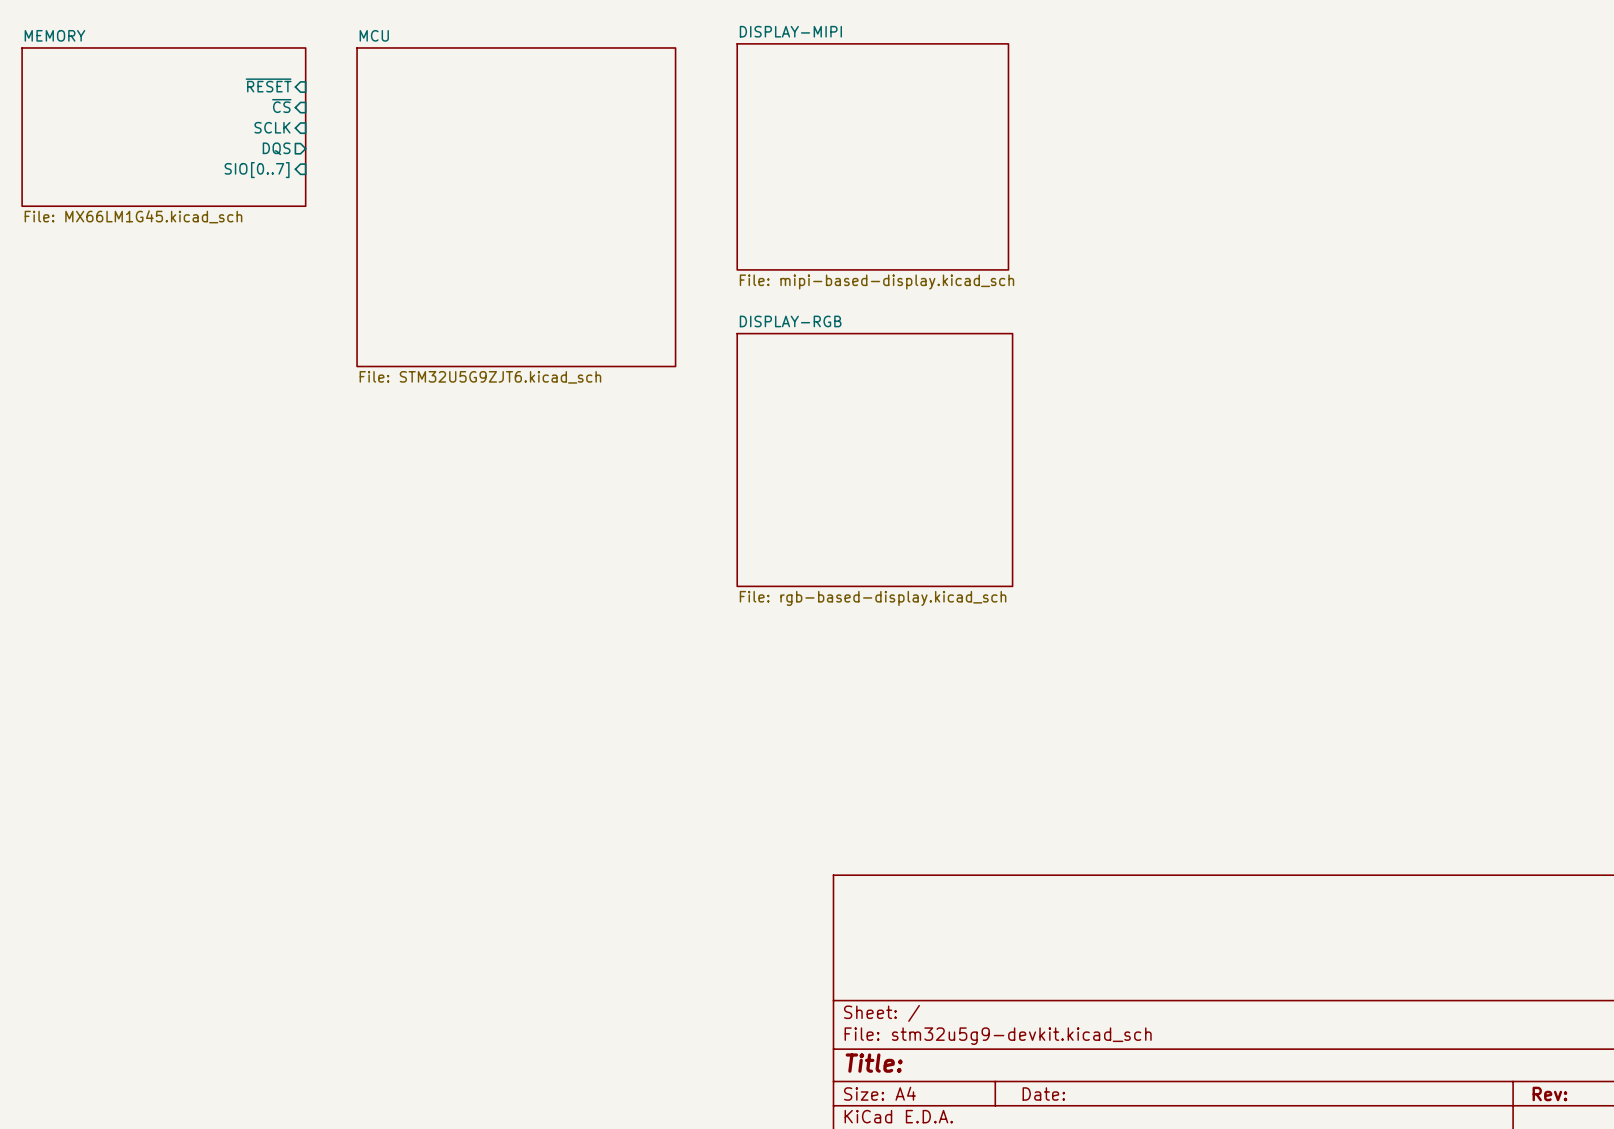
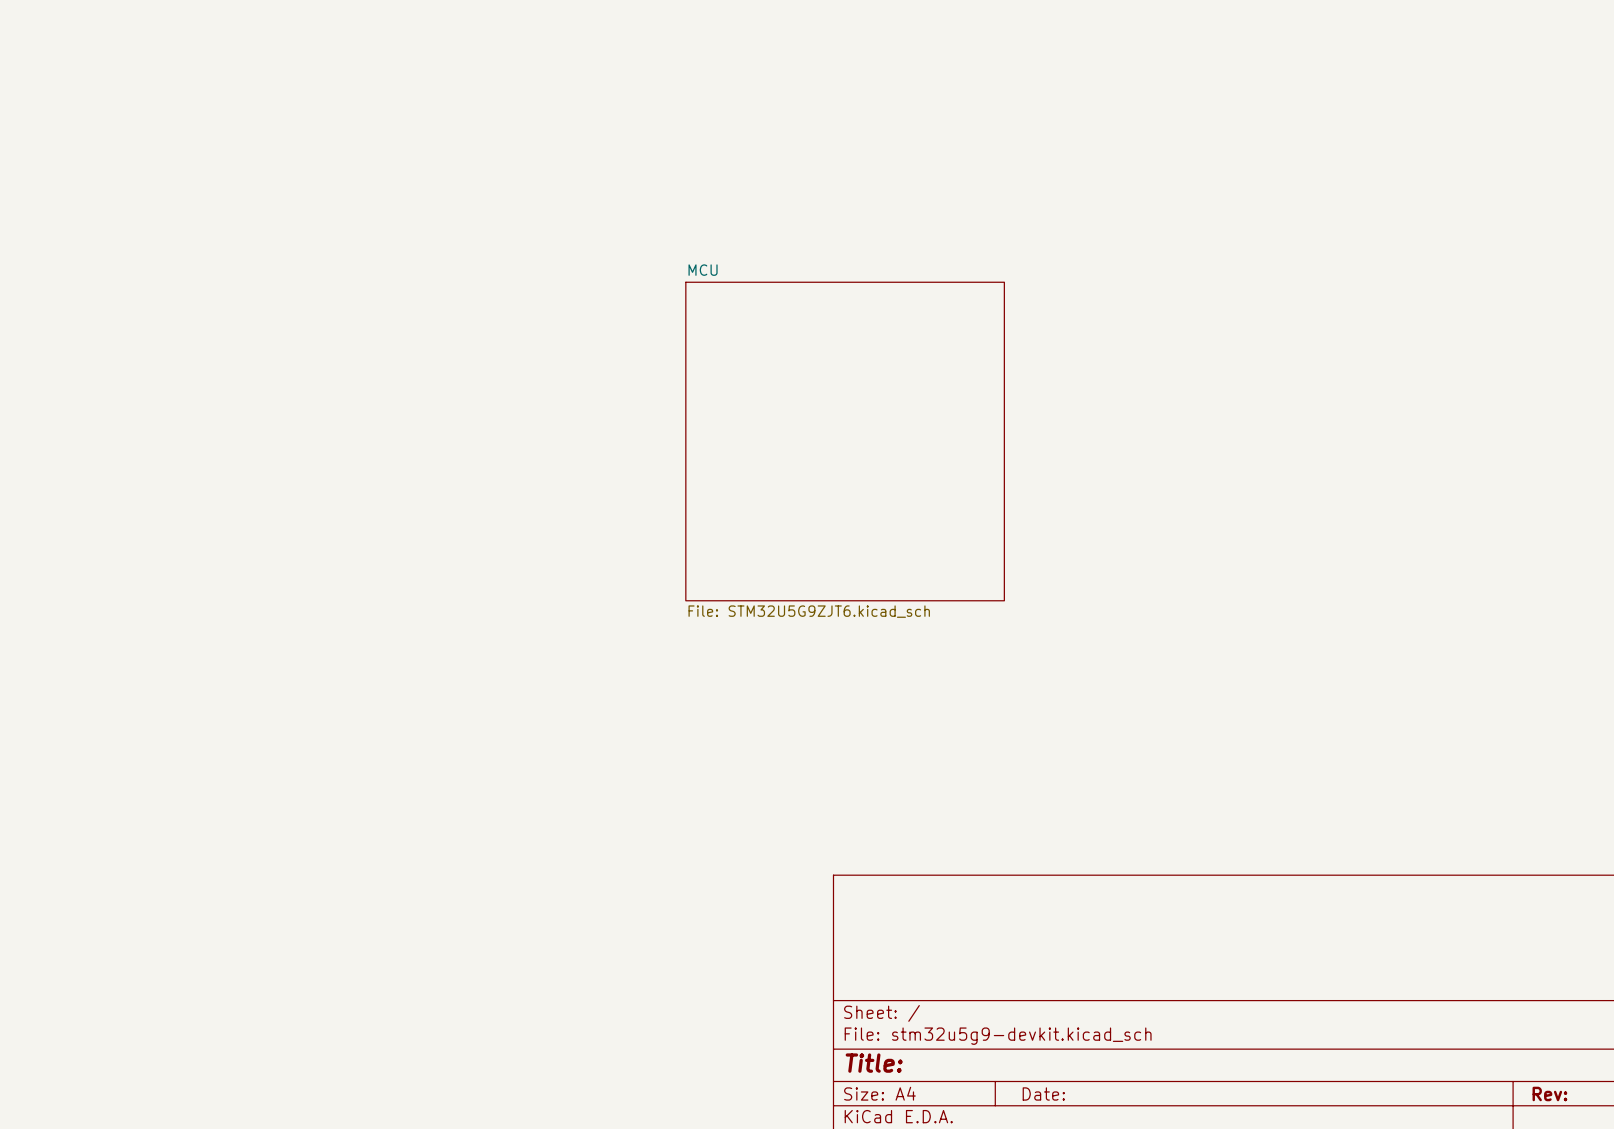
sheet pin: ~{RESET} (268, 85) -> none
sheet pin: ~{CS} (281, 106) -> none
sheet MEMORY: File: MX66LM1G45.kicad_sch (163, 127) -> none
sheet pin: SCLK (272, 127) -> none
sheet pin: DQS (276, 148) -> none
sheet DISPLAY-MIPI: File: mipi-based-display.kicad_sch (872, 156) -> none
sheet pin: SIO[0..7] (257, 170) -> none
sheet MCU: File: STM32U5G9ZJT6.kicad_sch (516, 207) -> none
sheet MCU: none -> File: STM32U5G9ZJT6.kicad_sch (845, 441)
sheet DISPLAY-RGB: File: rgb-based-display.kicad_sch (874, 460) -> none

